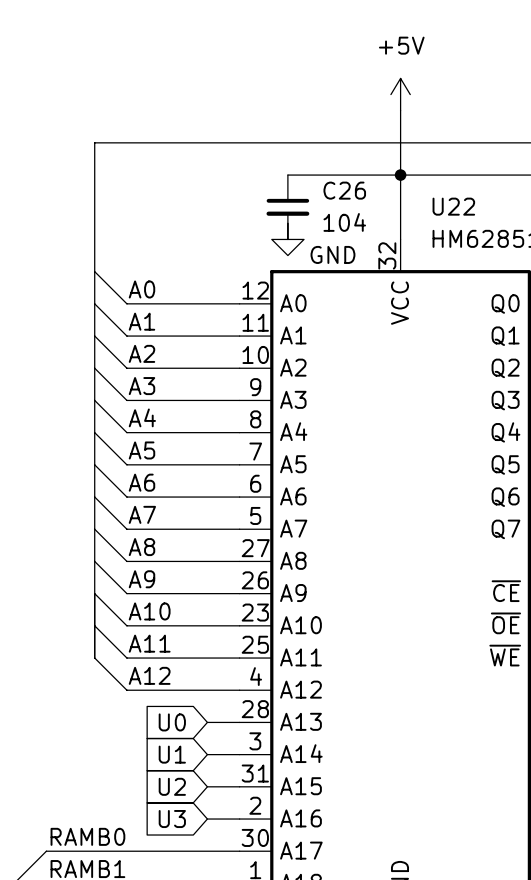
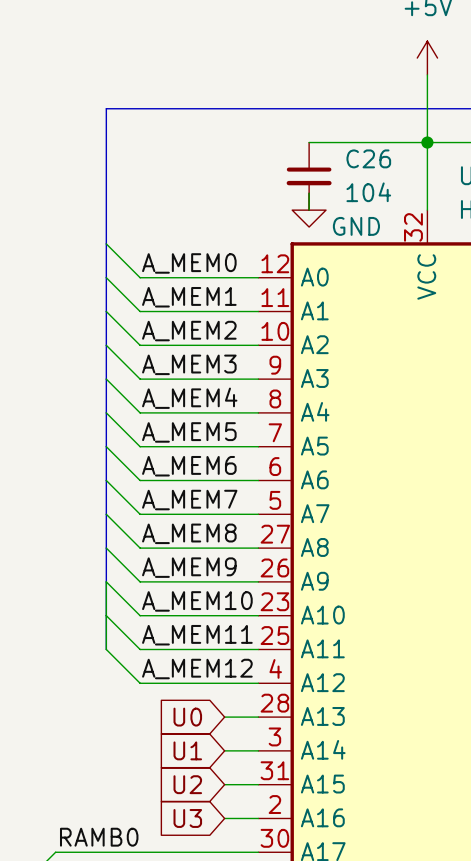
label: A0 (141, 289) -> A_MEM0 (189, 263)
label: A1 (141, 321) -> A_MEM1 (189, 297)
label: A2 (141, 353) -> A_MEM2 (189, 331)
label: A3 (141, 386) -> A_MEM3 (189, 364)
label: A4 (142, 417) -> A_MEM4 (189, 398)
label: A5 (141, 450) -> A_MEM5 (189, 432)
label: A6 (141, 482) -> A_MEM6 (189, 466)
label: A7 (142, 514) -> A_MEM7 (189, 500)
label: A8 (141, 547) -> A_MEM8 (189, 533)
label: A9 (141, 579) -> A_MEM9 (189, 567)
label: A10 (149, 611) -> A_MEM10 (197, 601)
label: A11 (149, 643) -> A_MEM11 (197, 635)
label: A12 (149, 675) -> A_MEM12 (197, 669)

